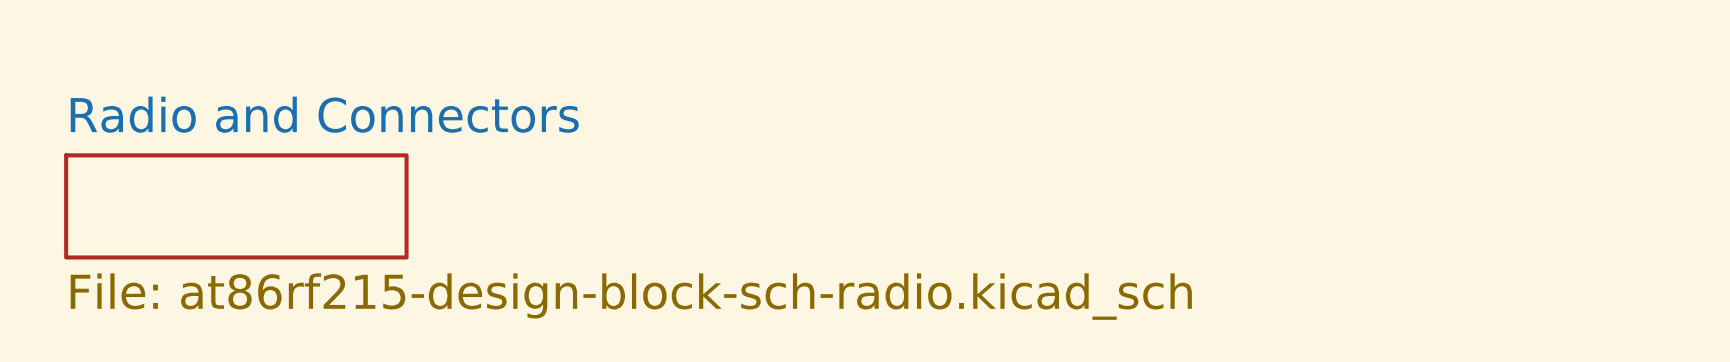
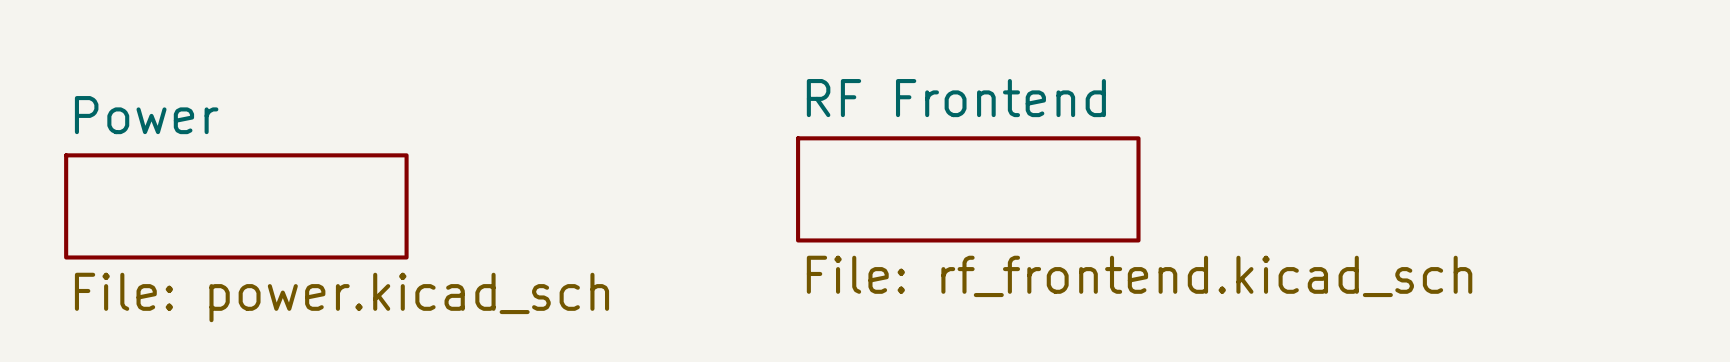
sheet Radio and Connectors name: Radio and Connectors (324, 114) -> Power (146, 115)
sheet RF Frontend: none -> File: rf_frontend.kicad_sch (968, 189)
sheet Radio and Connectors value: File: at86rf215-design-block-sch-radio.kicad_sch (631, 296) -> File: power.kicad_sch (341, 297)

